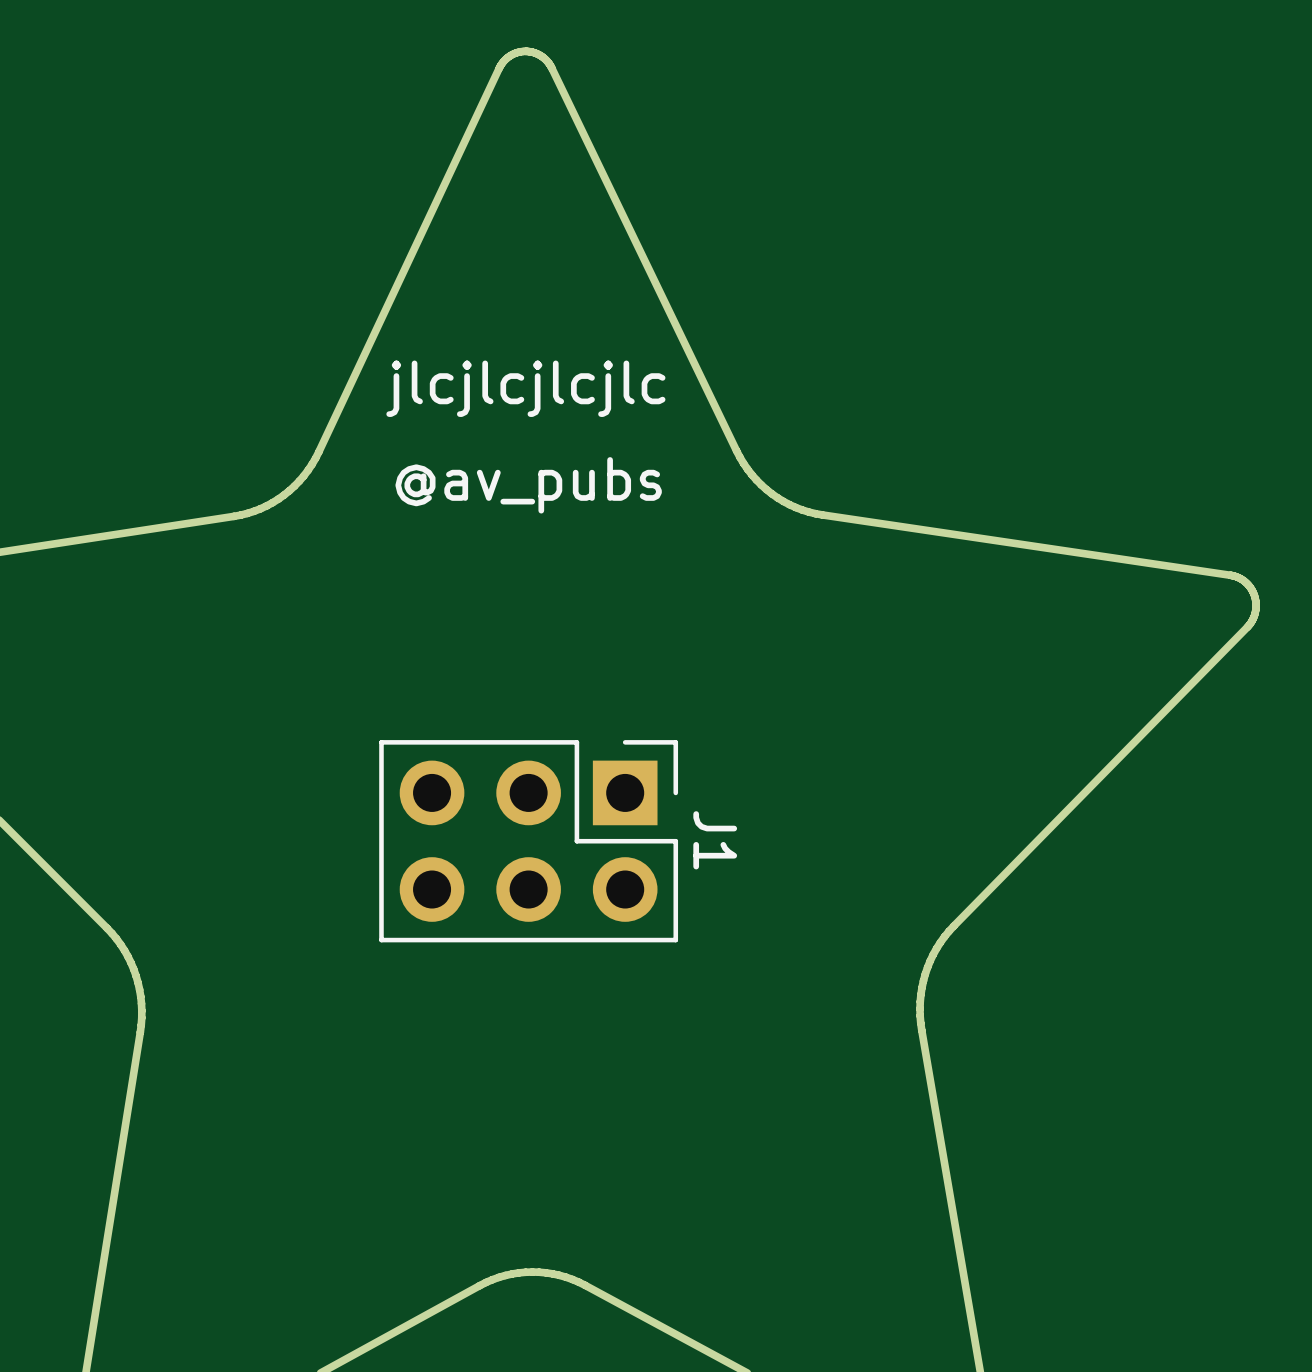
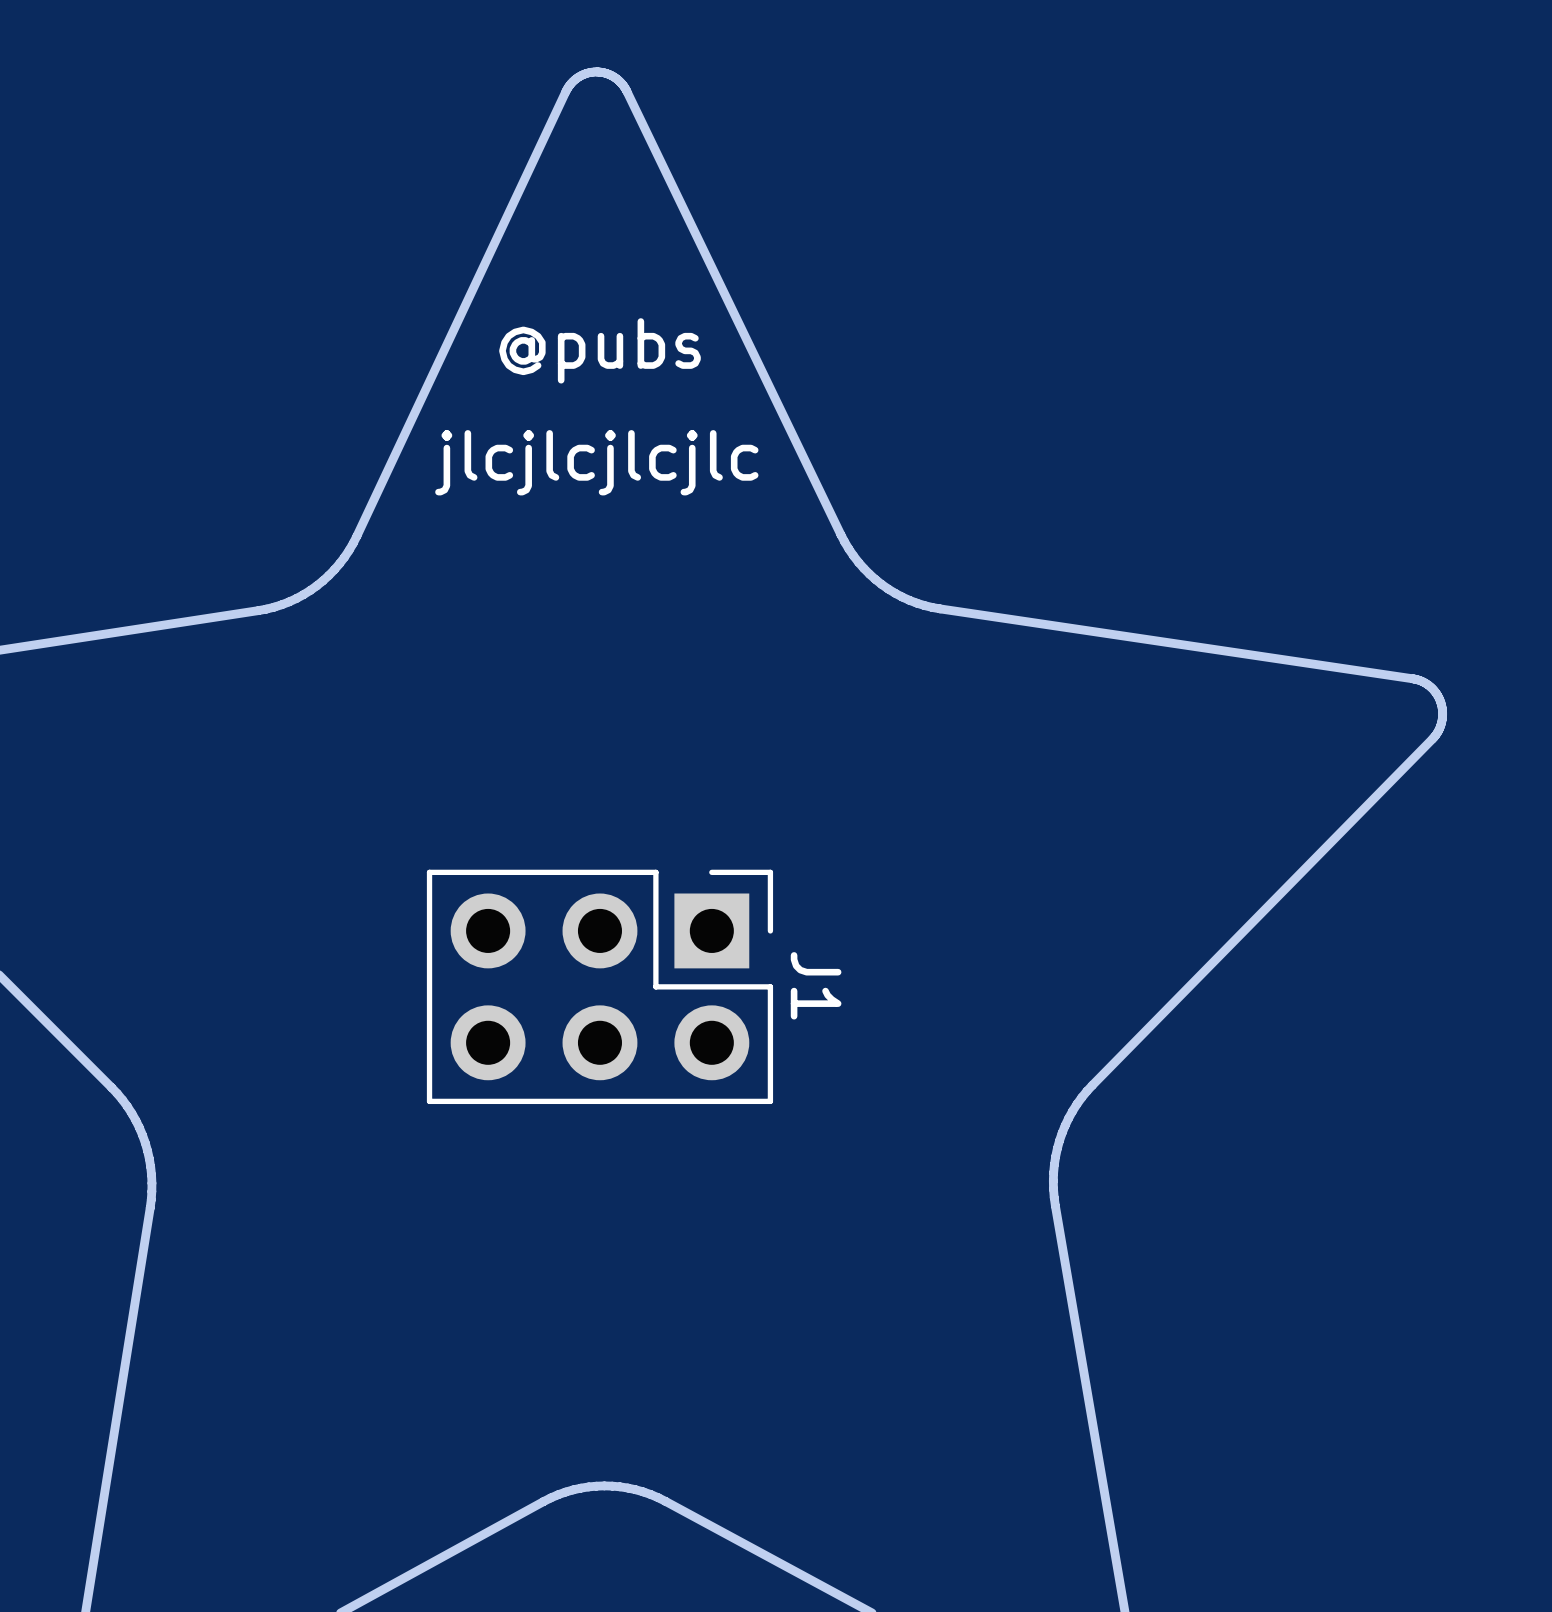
text: none -> @pubs (599, 350)
text: @av_pubs (528, 485) -> none

